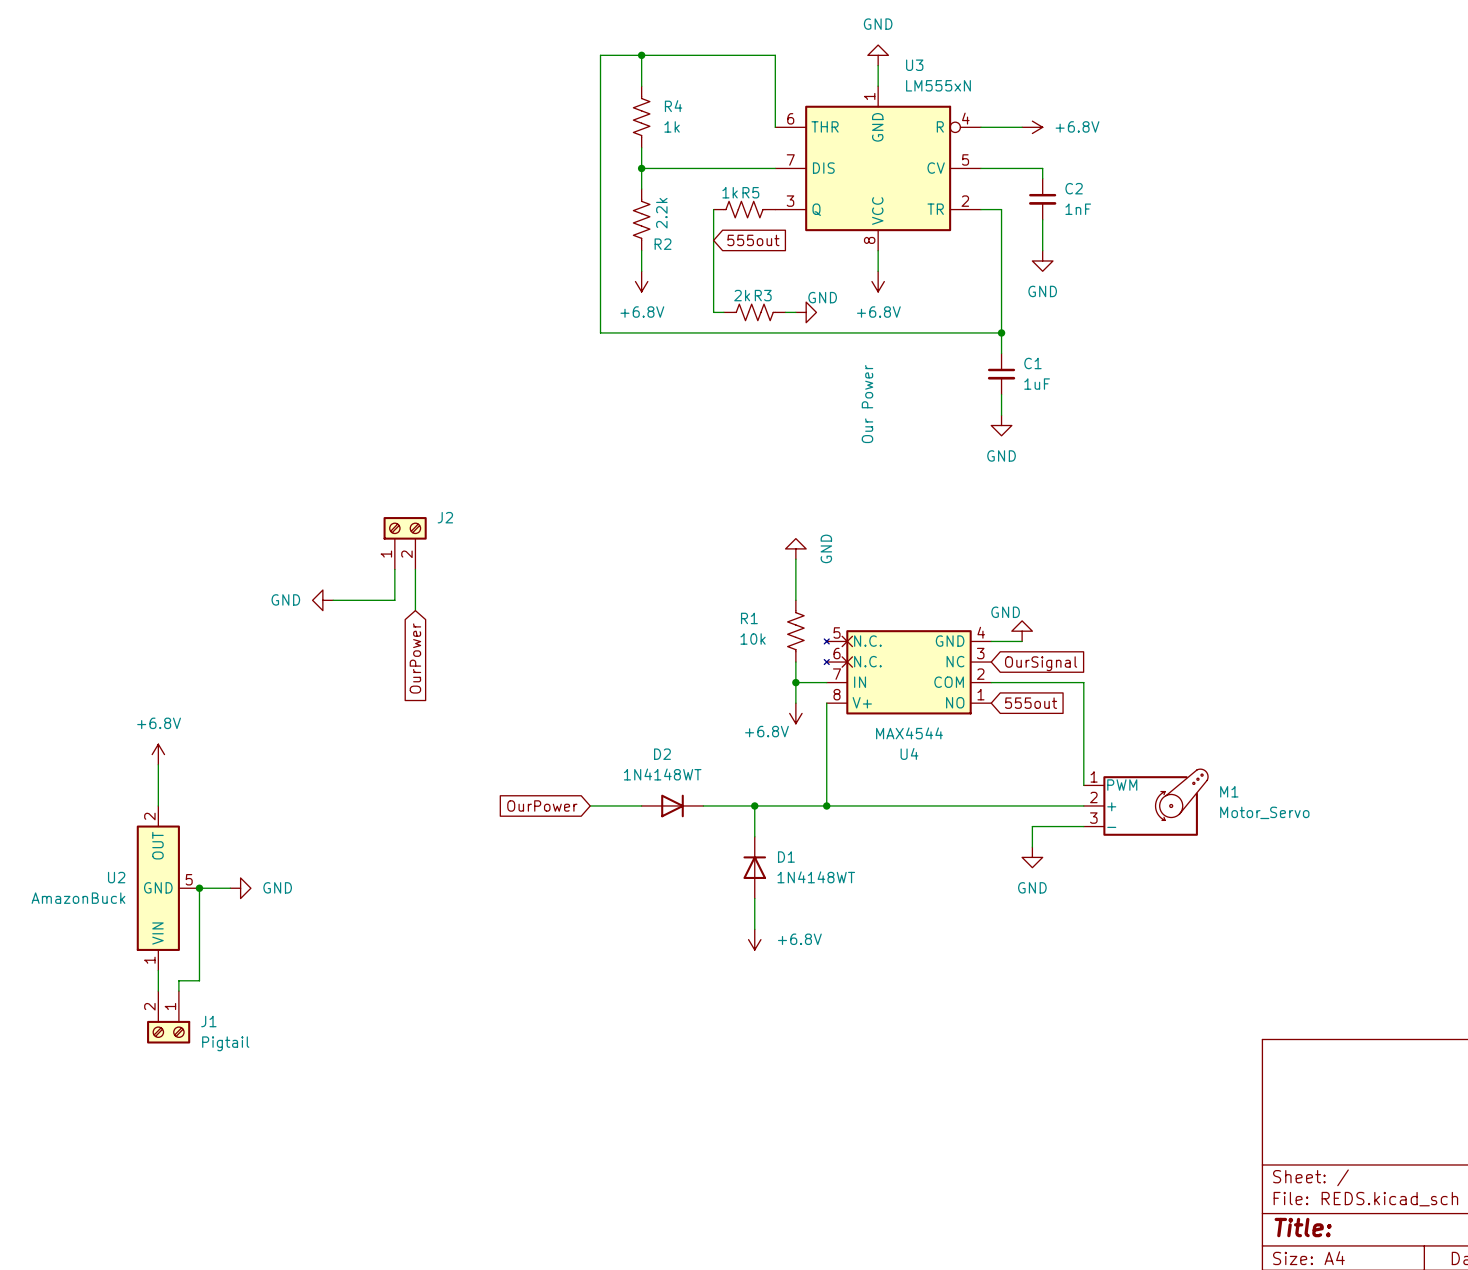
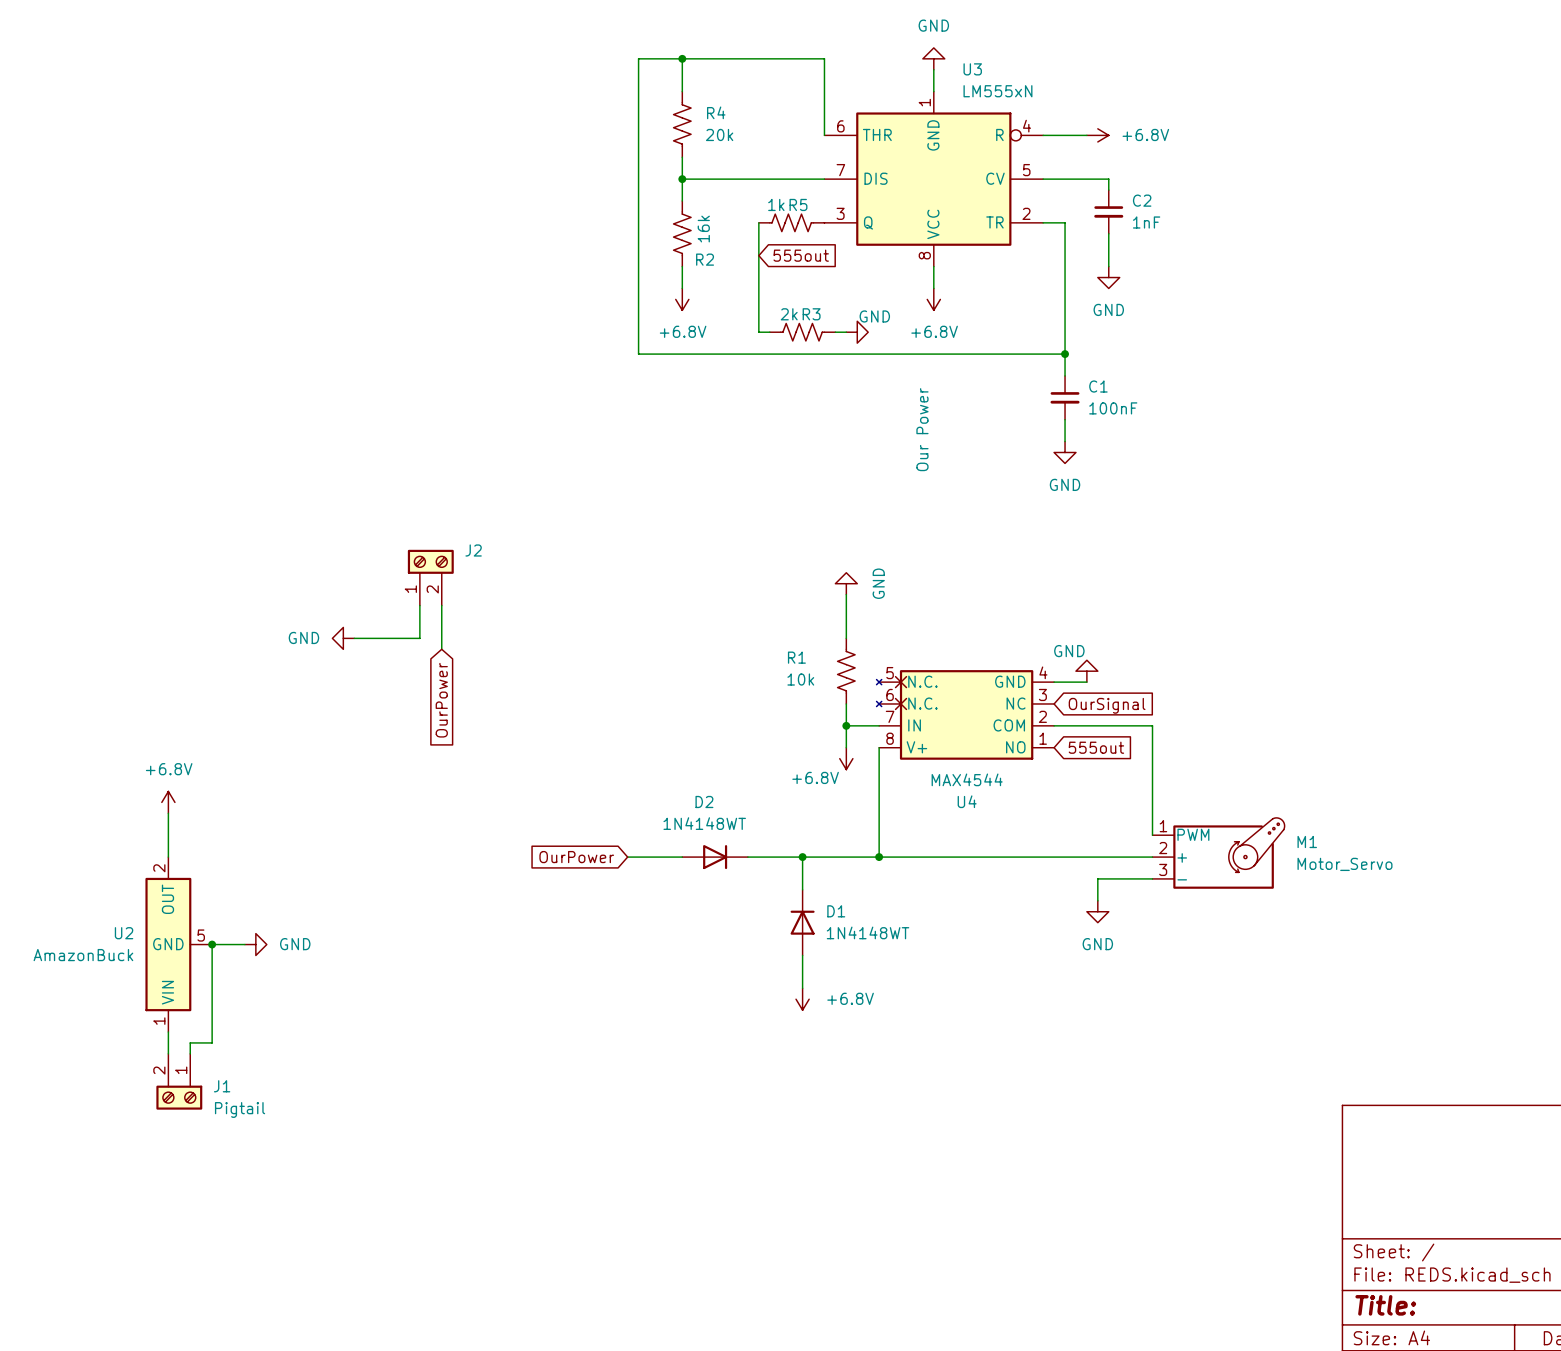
R4 value: 1k (672, 126) -> 20k (719, 134)
R2 value: 2.2k (661, 213) -> 16k (703, 229)
C1 value: 1uF (1037, 384) -> 100nF (1113, 408)

